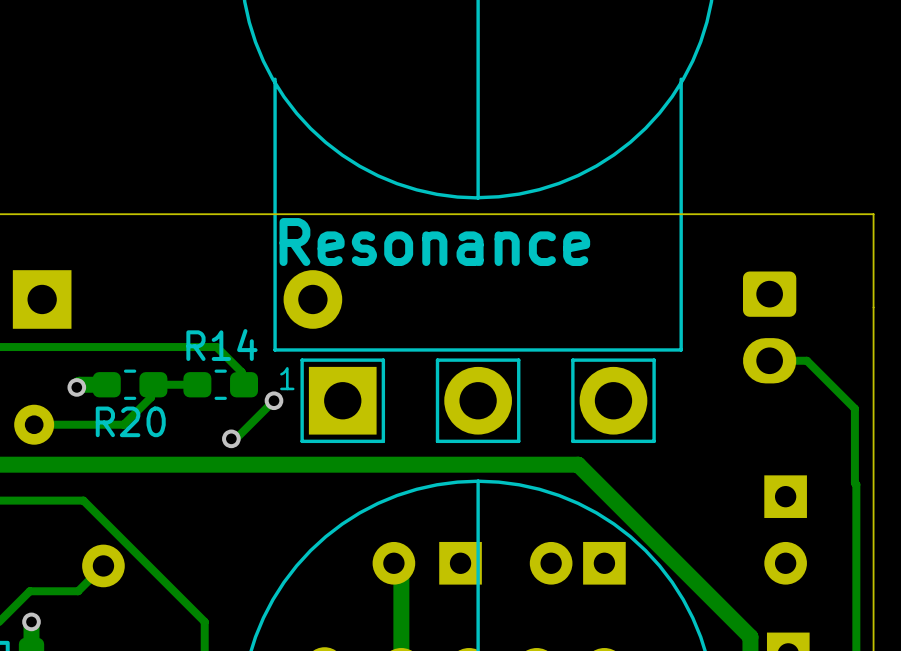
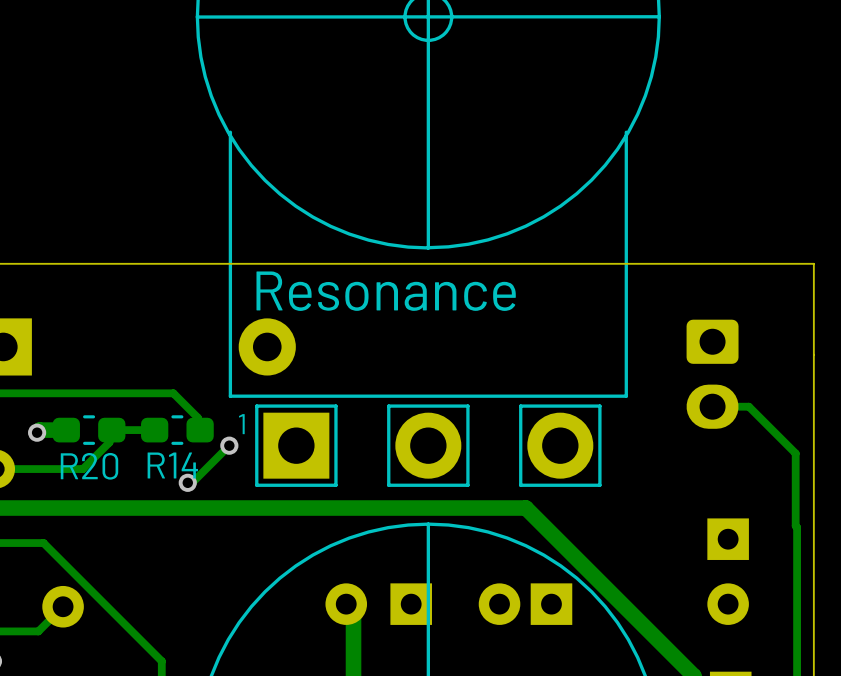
R14 name position: R14 (221, 345) -> R14 (172, 465)

